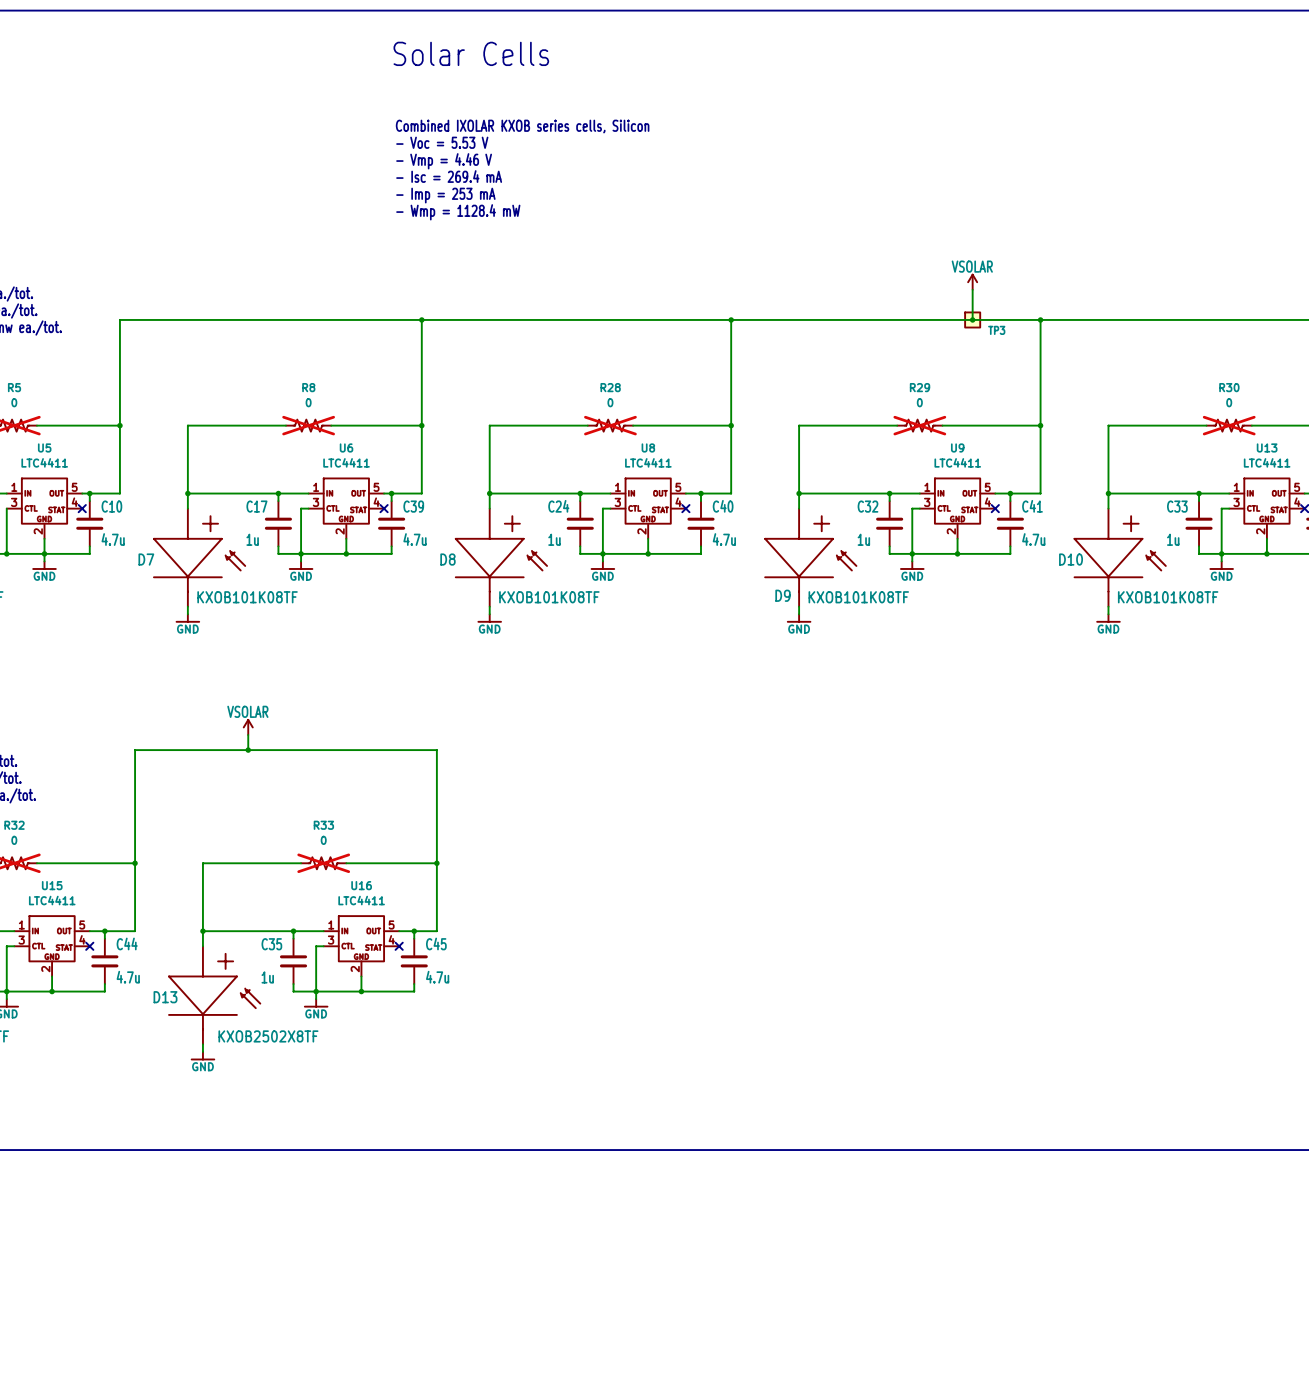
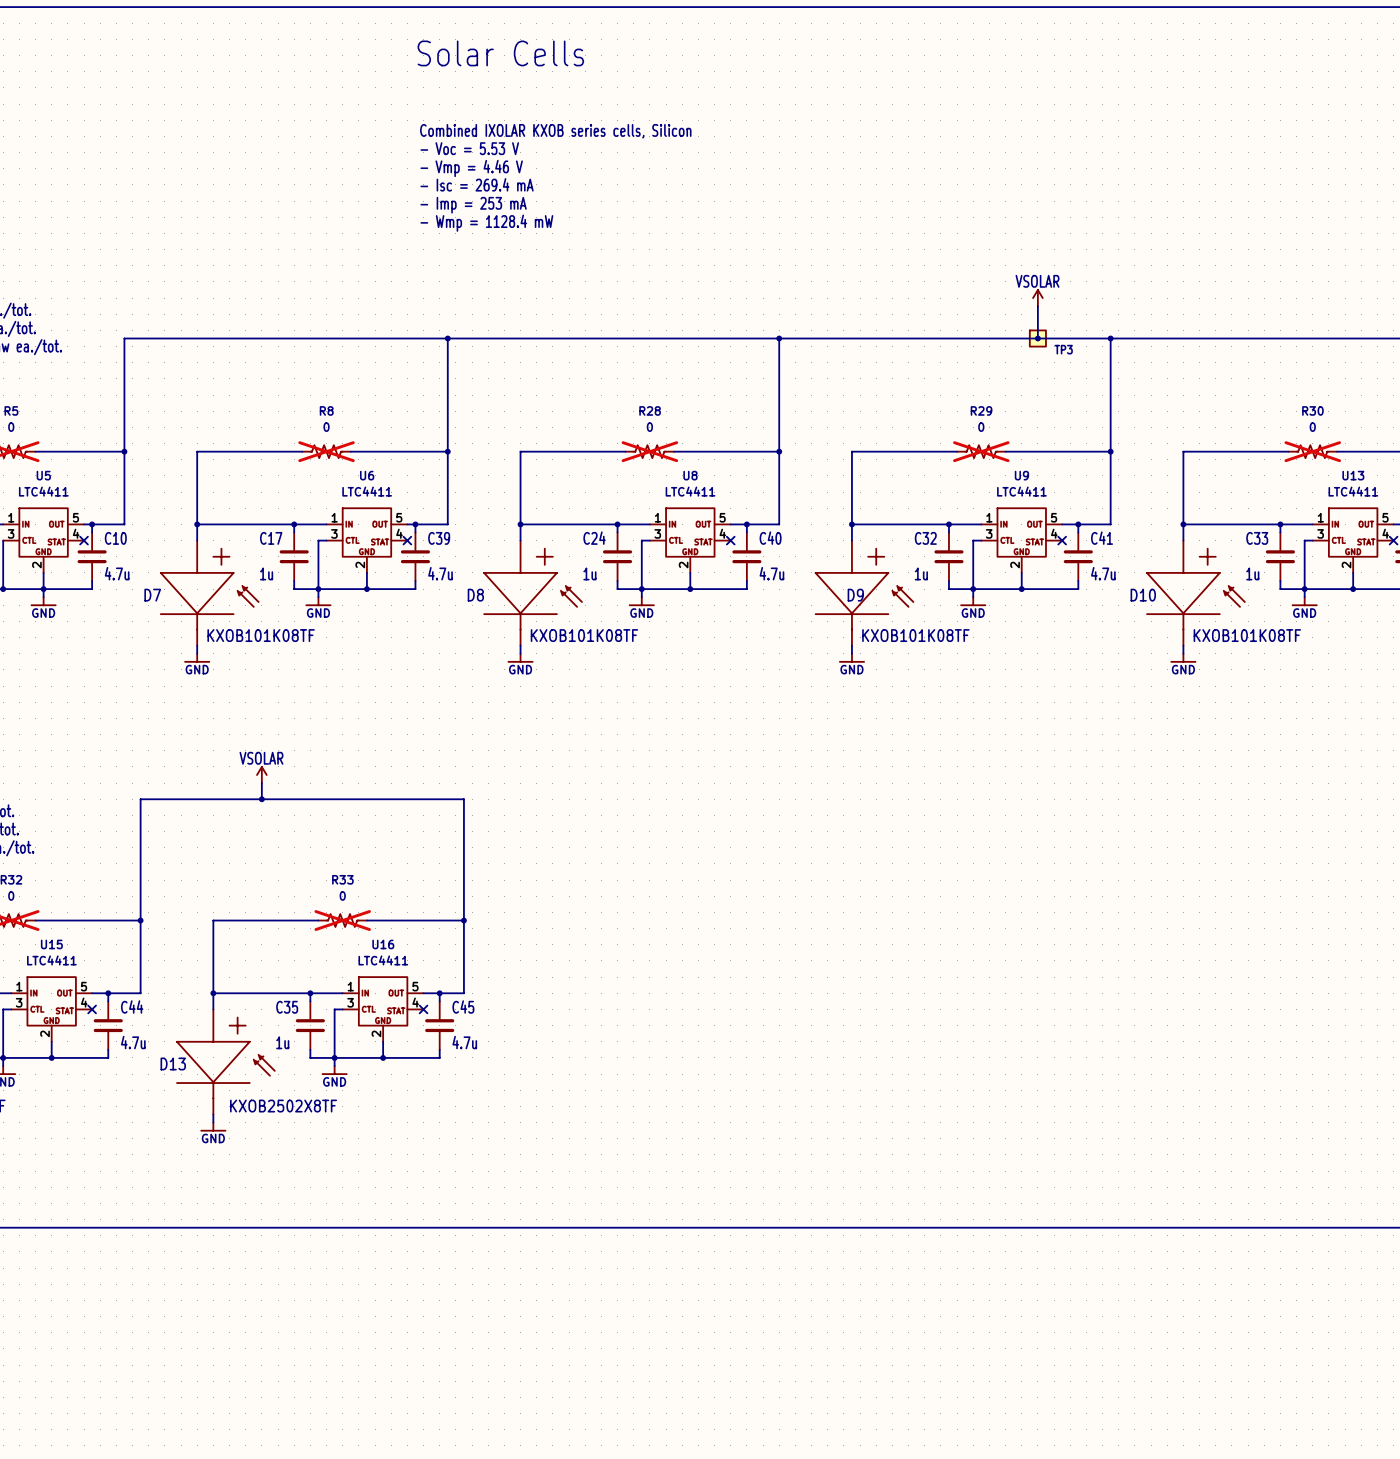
D9 name position: D9 (783, 595) -> D9 (855, 595)

